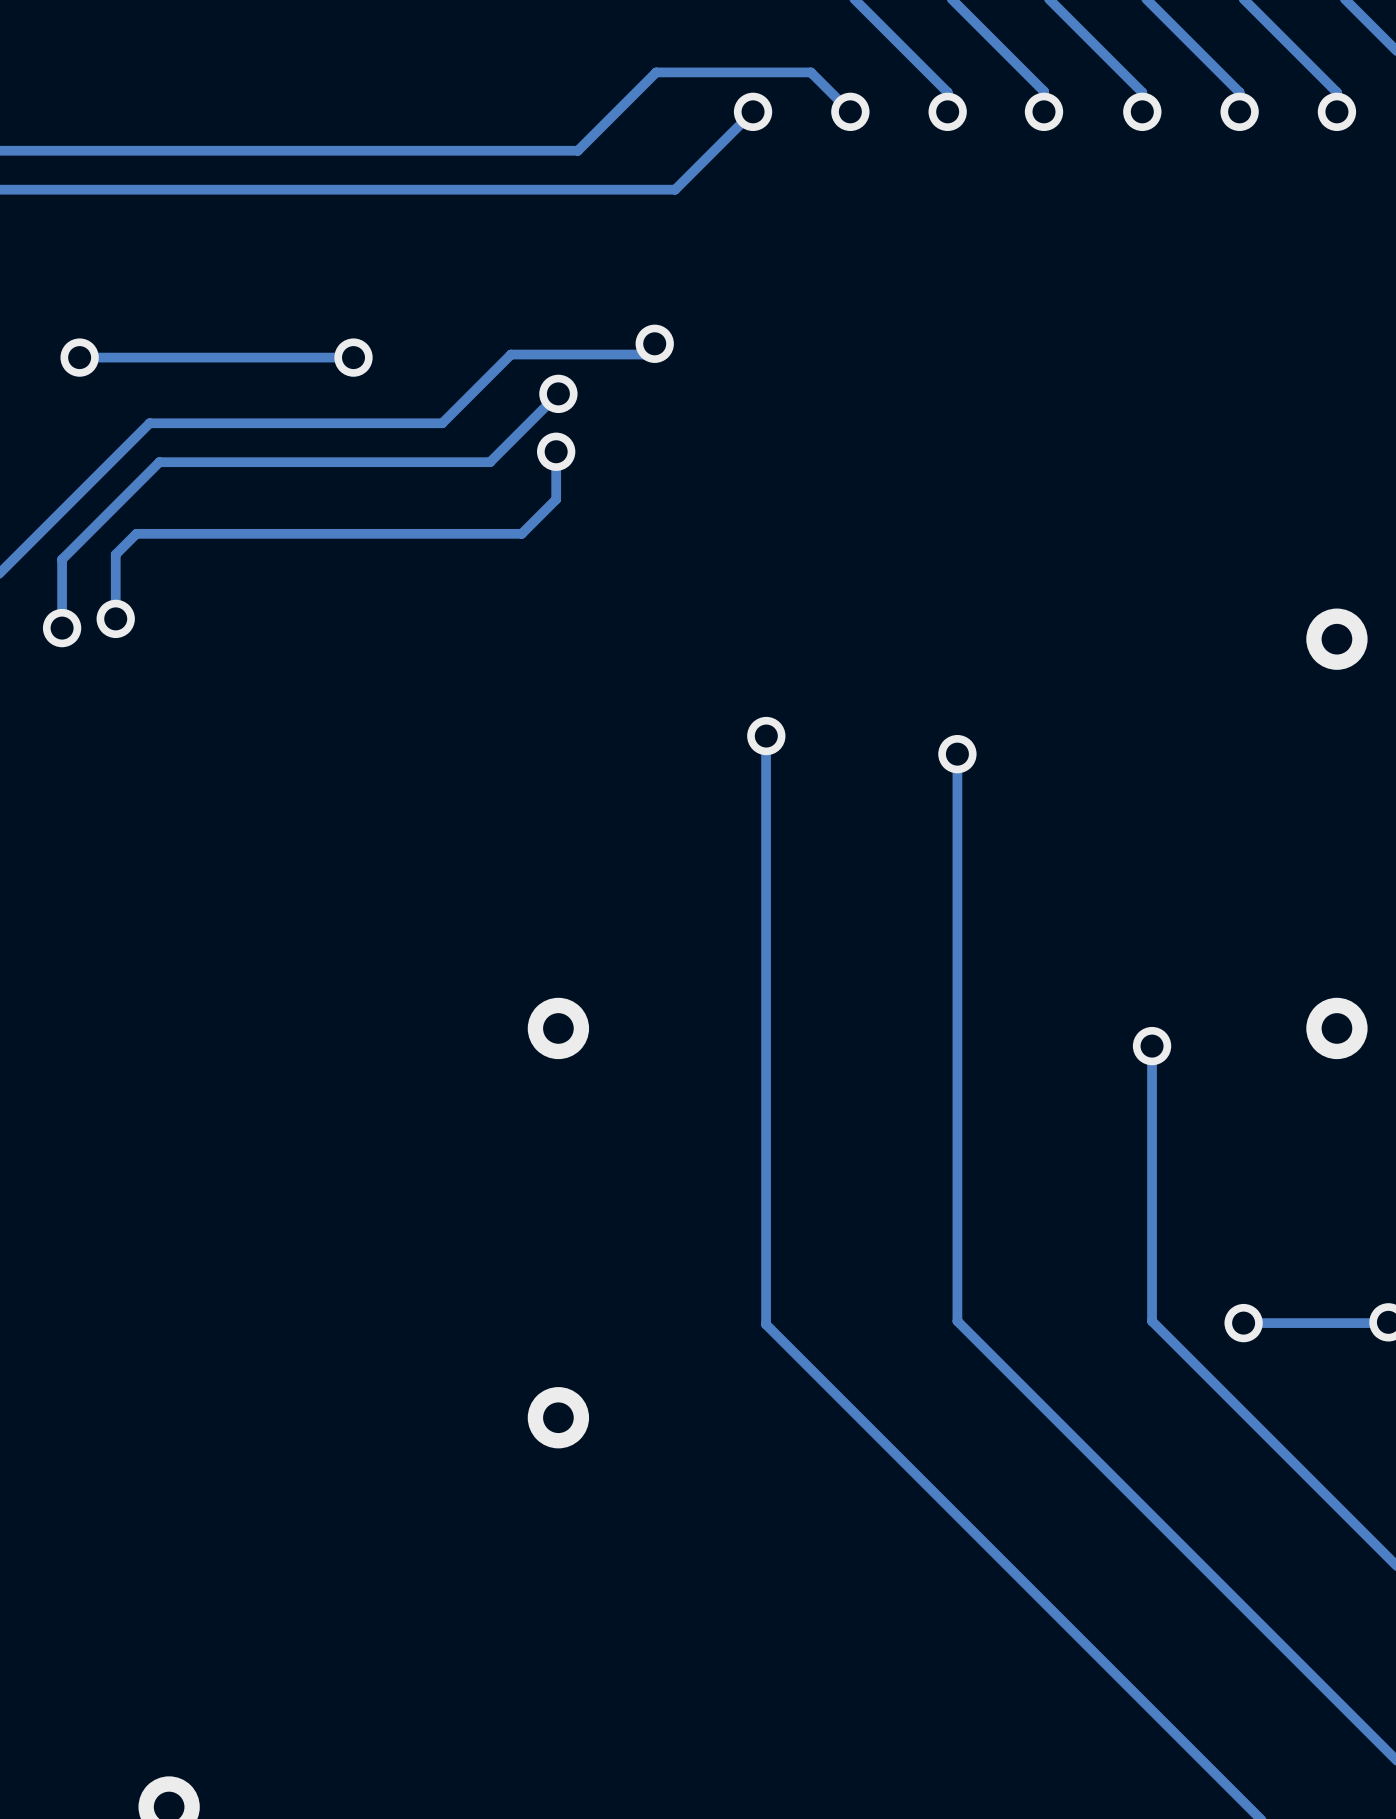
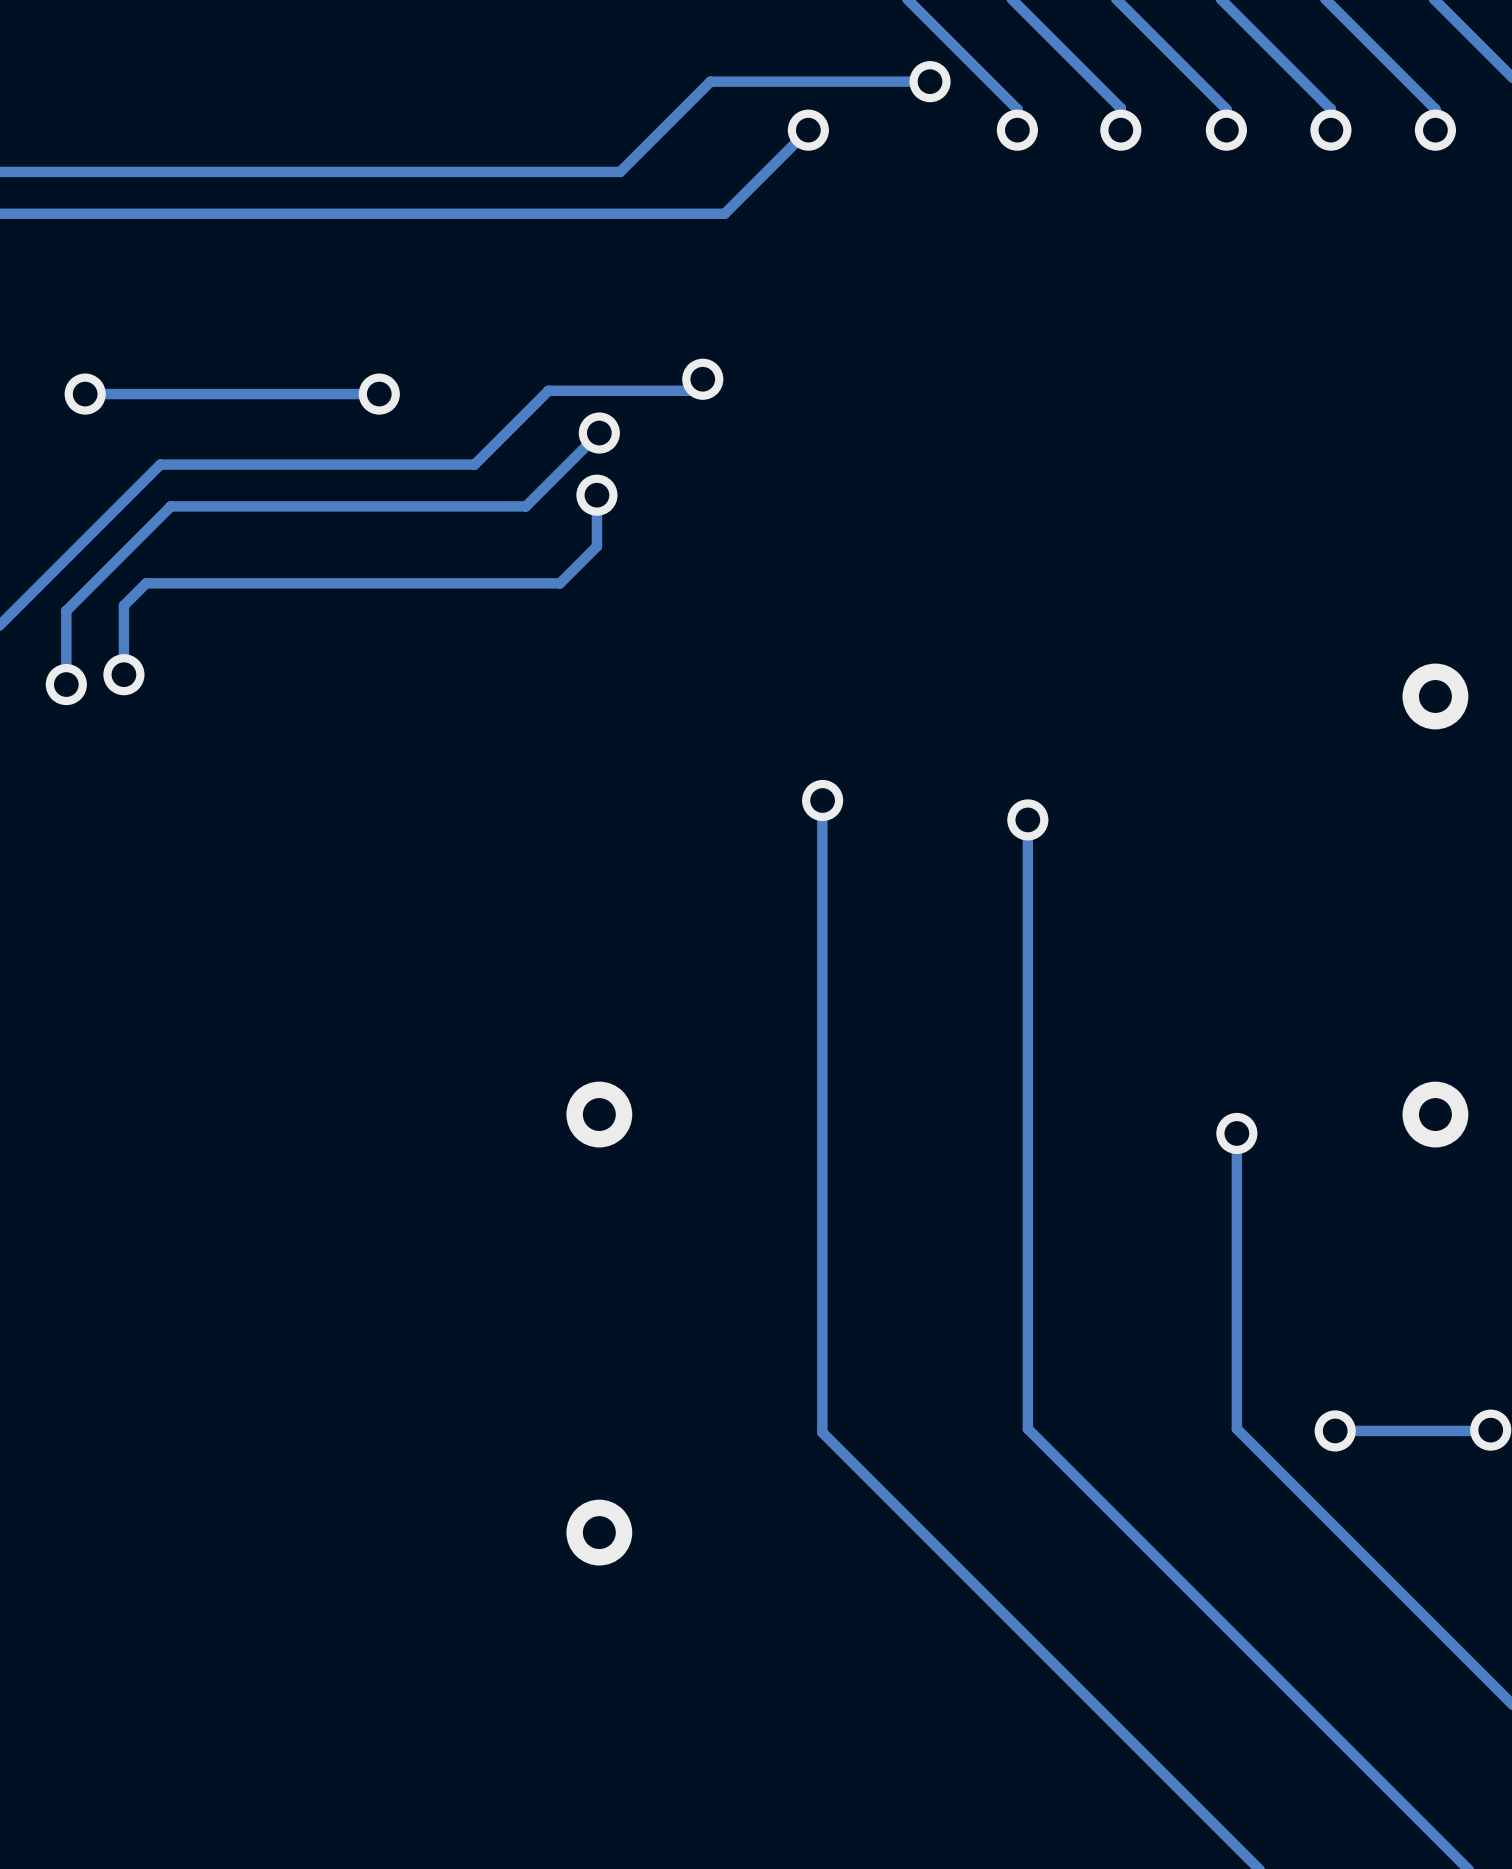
track: (656, 72) (810, 72) (850, 111) -> (704, 87) (710, 81) (930, 81)
via position: (850, 111) -> (930, 81)

